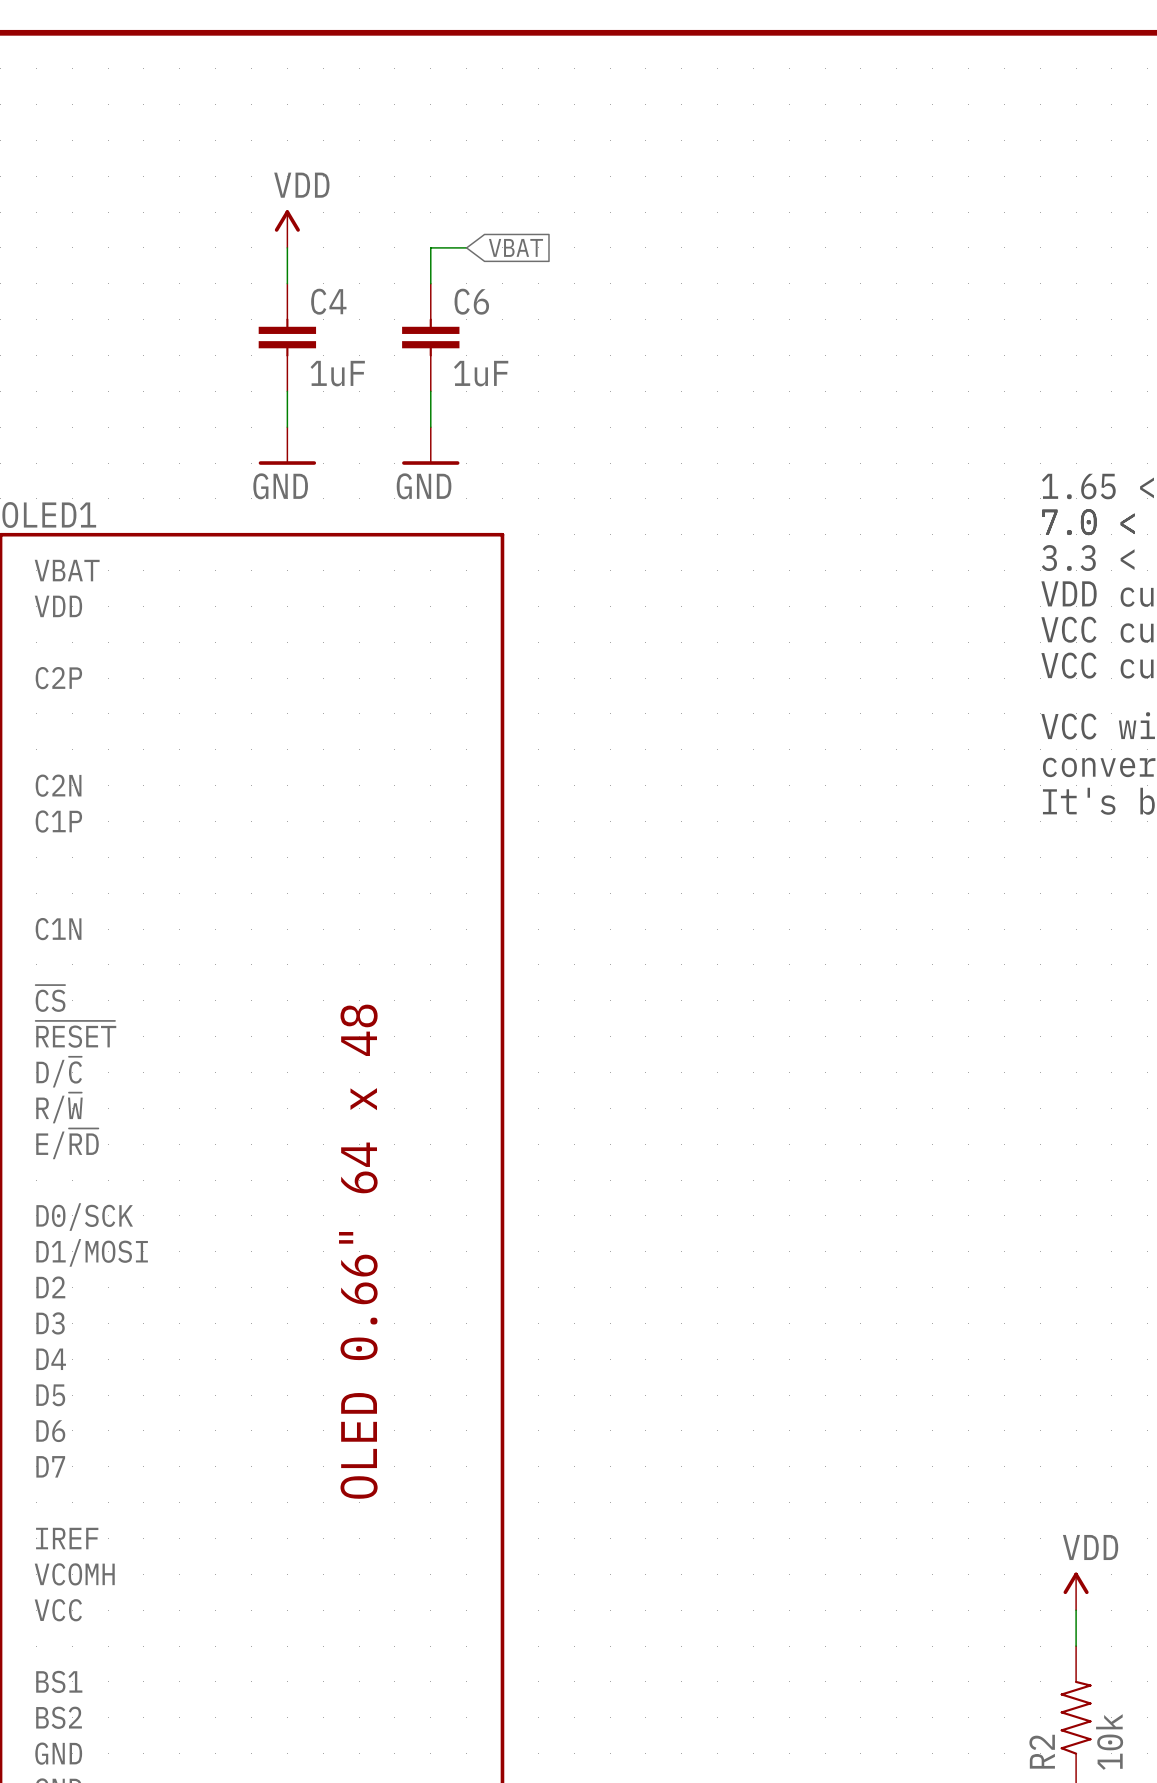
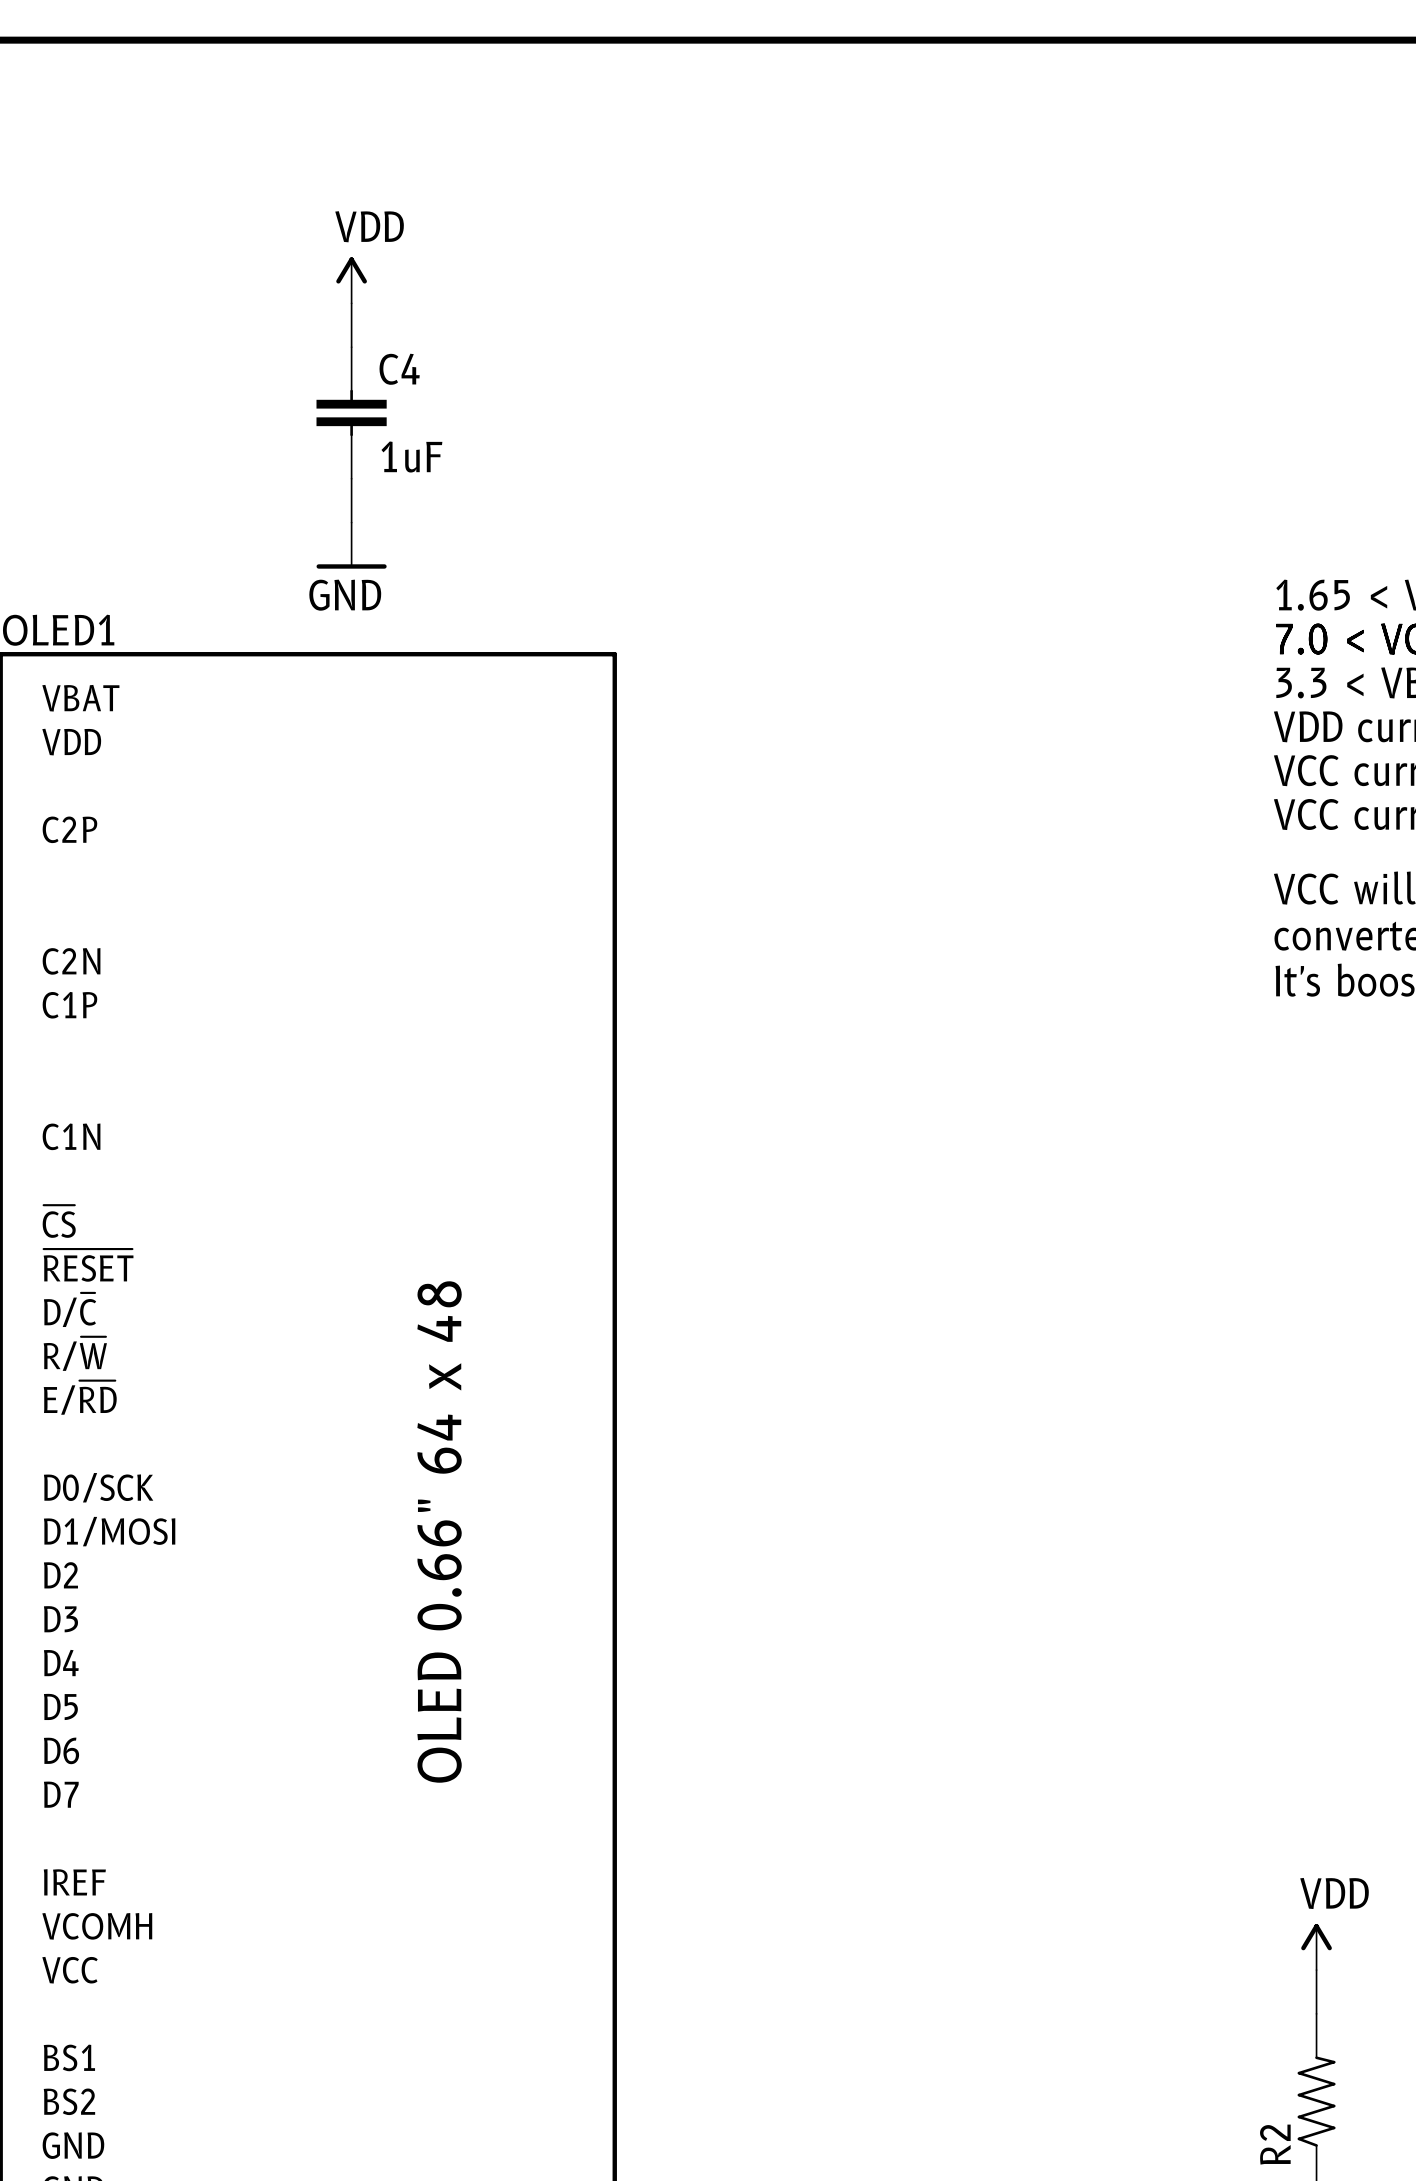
wire: (466, 247) (430, 247) (430, 283) -> none
global label: VBAT (516, 247) -> none
C6: 1uF (430, 337) -> none
wire: (430, 391) (430, 427) -> none
power symbol: GND (430, 445) -> none
R2 value: 10k (1109, 1742) -> none

